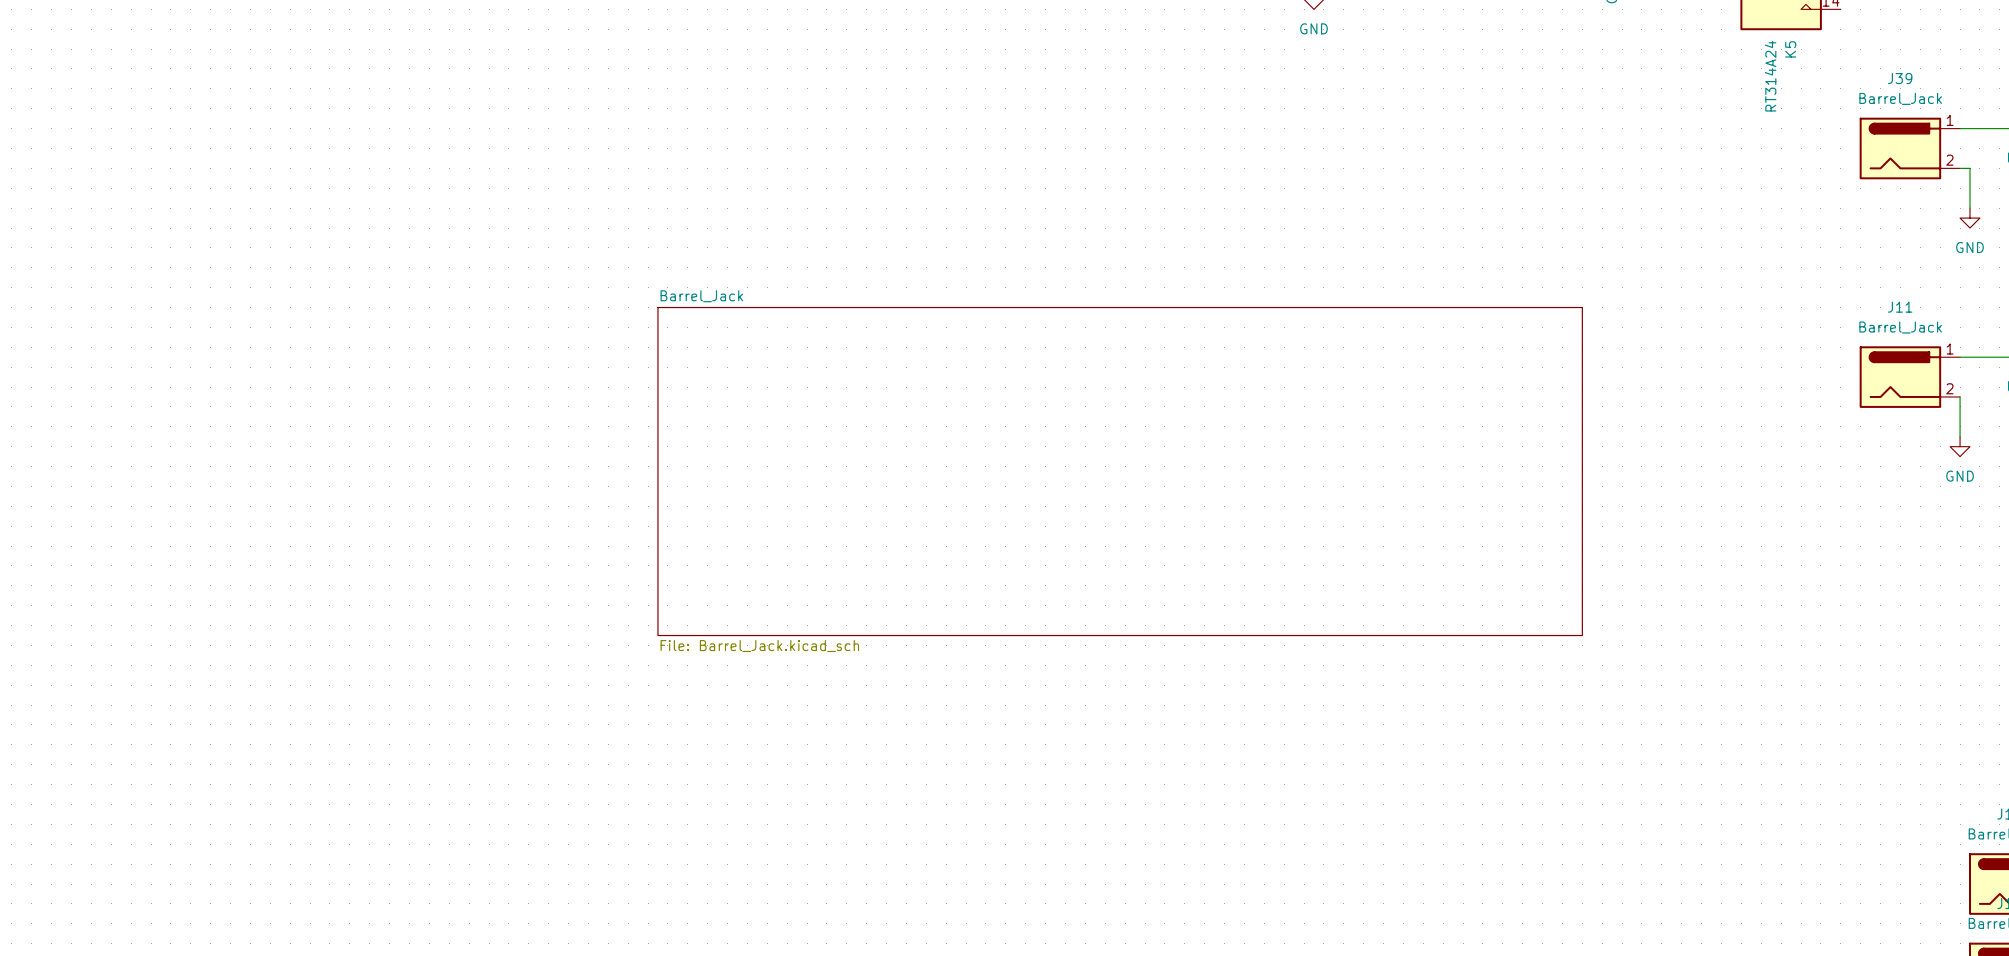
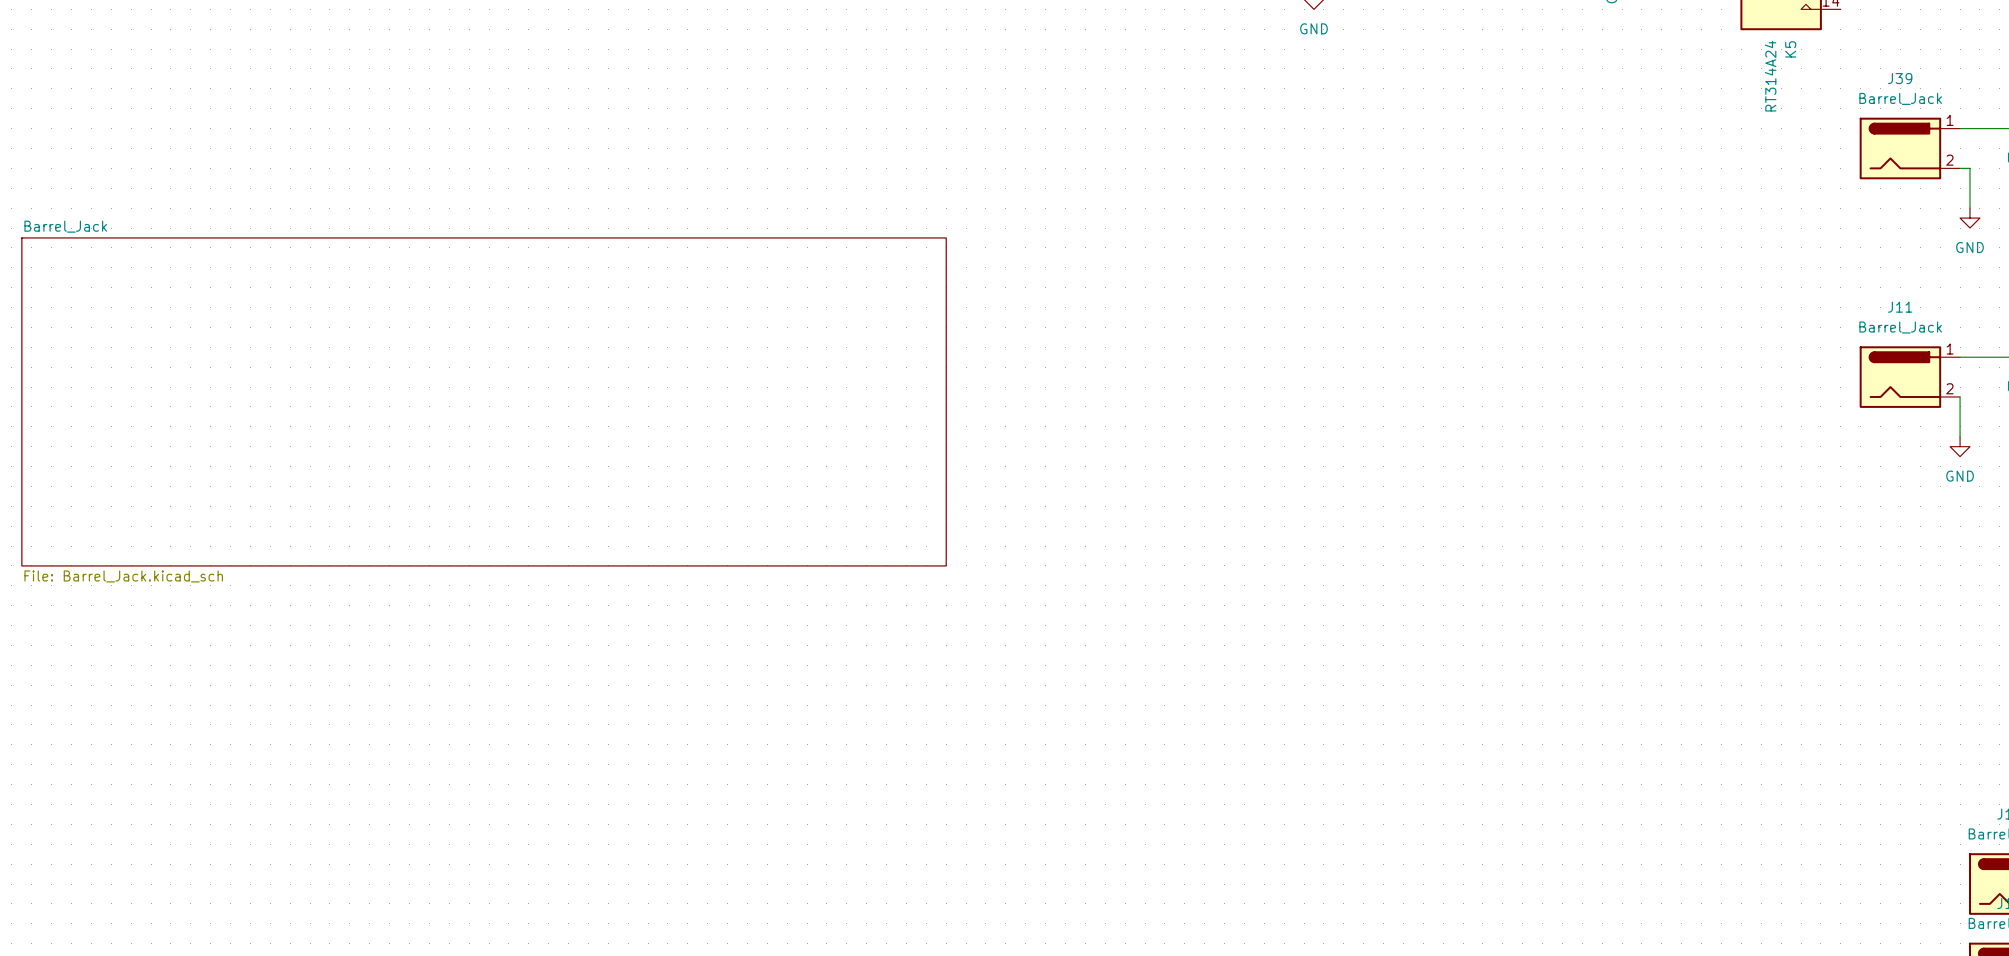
sheet Barrel_Jack: none -> File: Barrel_Jack.kicad_sch (484, 401)
sheet Barrel_Jack: File: Barrel_Jack.kicad_sch (1120, 471) -> none

